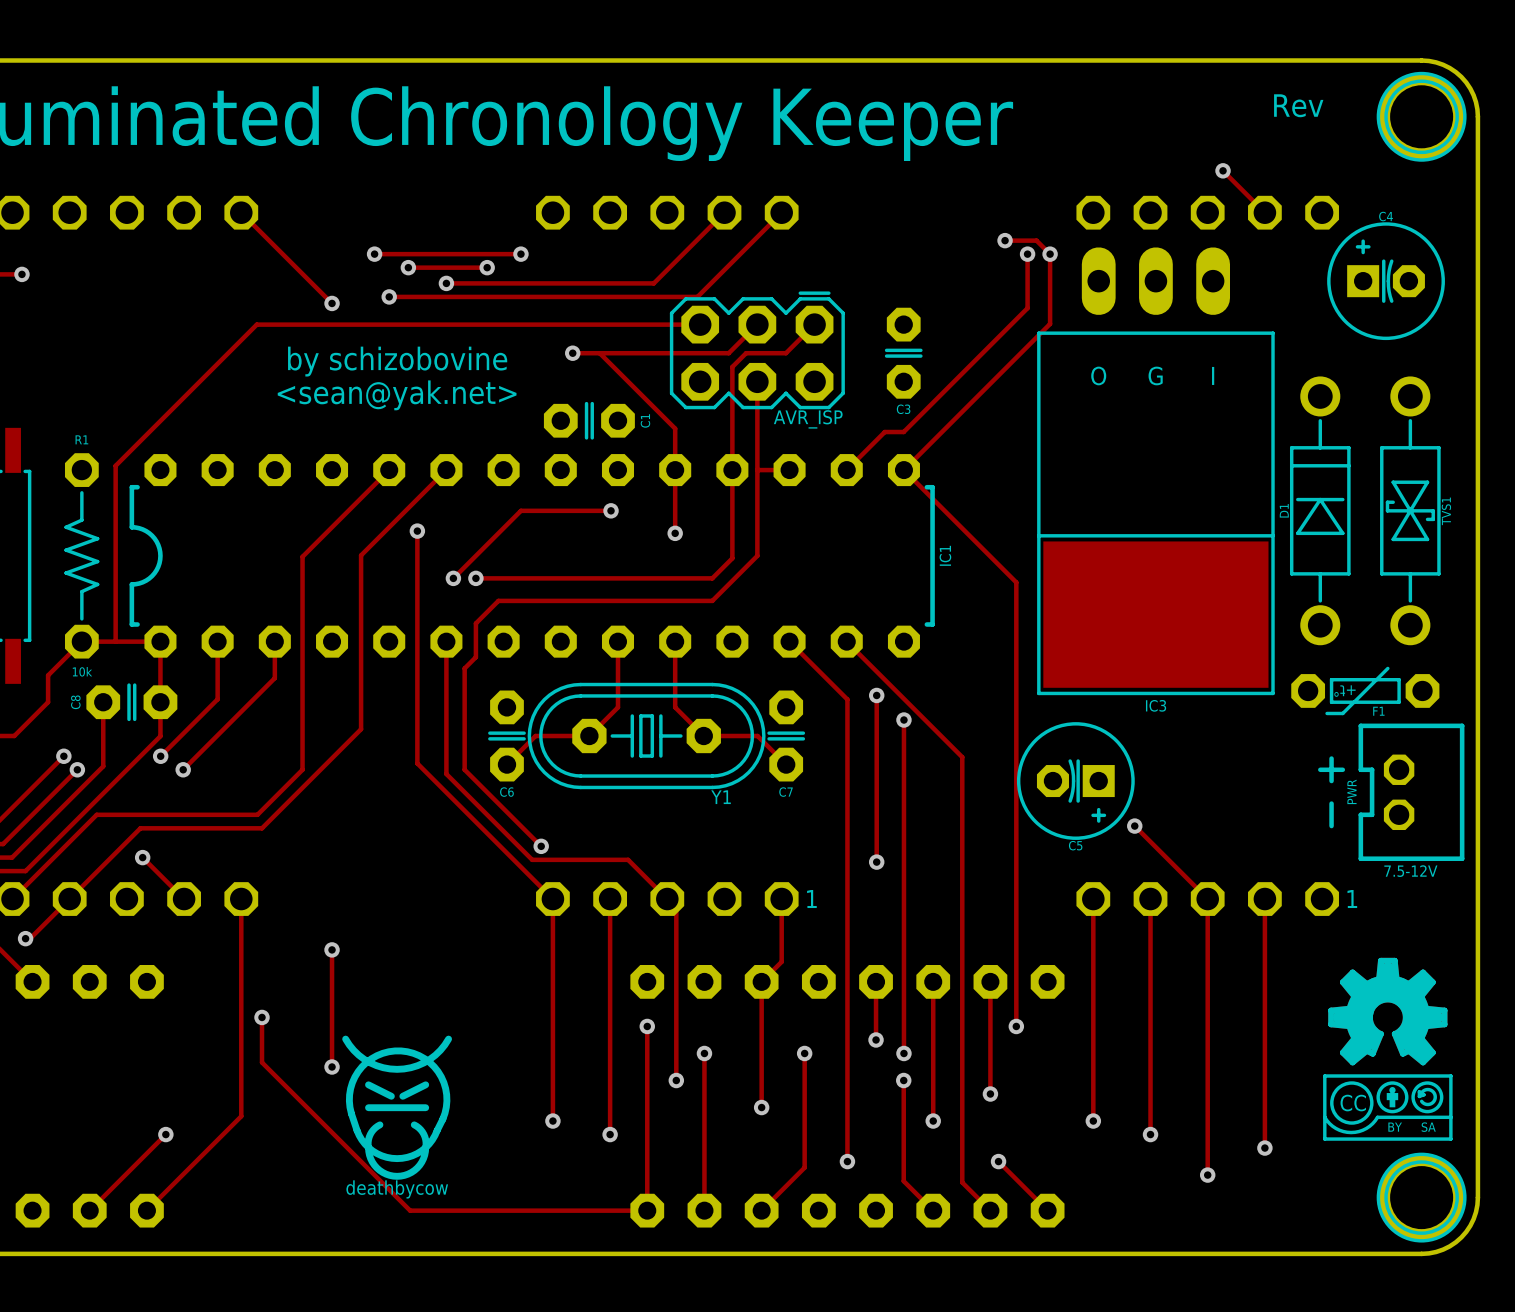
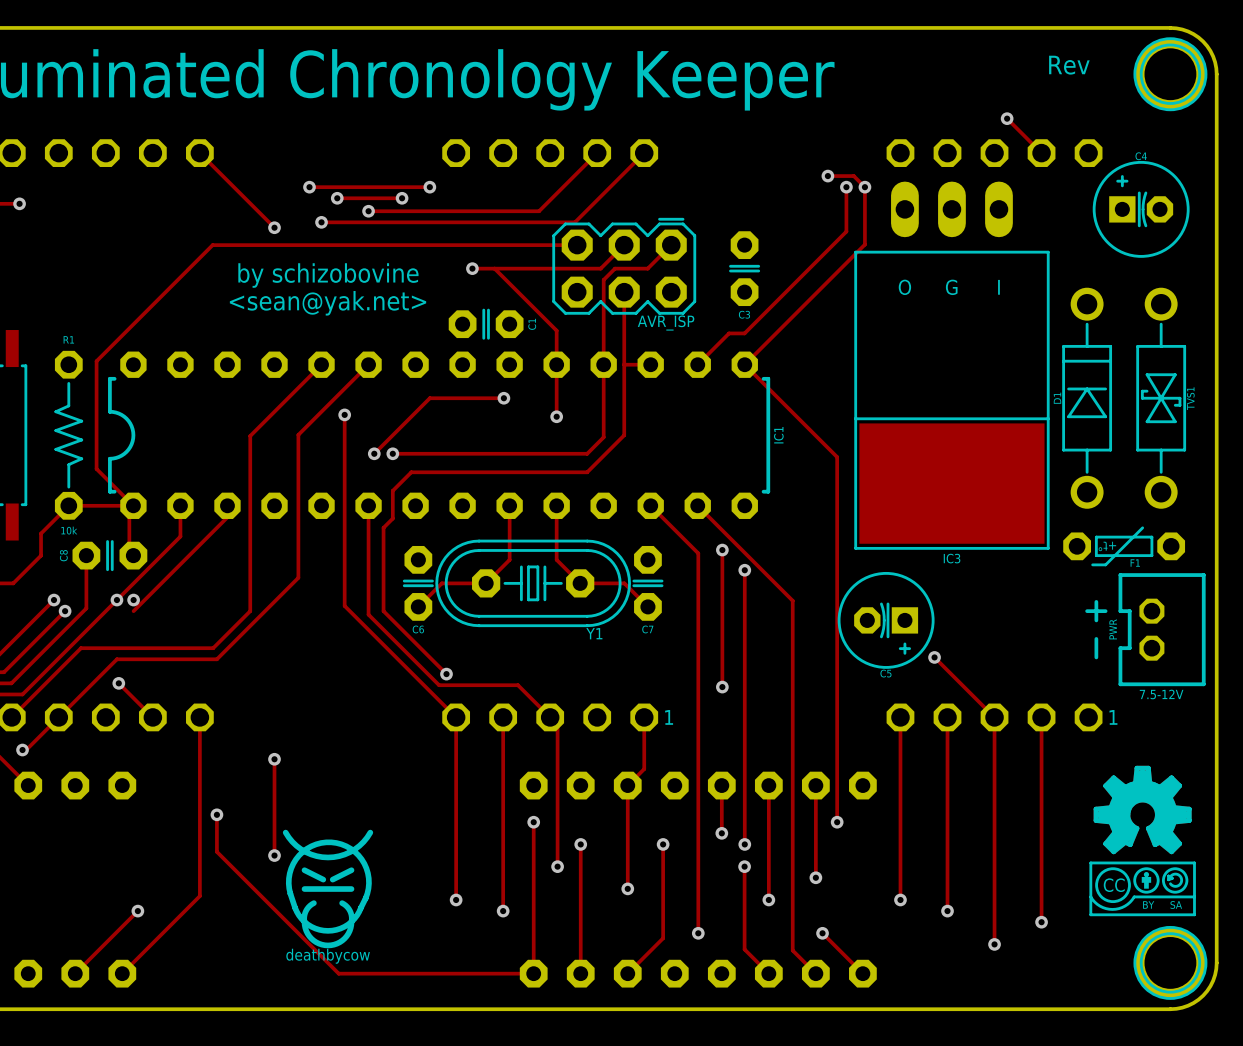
track: (115, 596) (115, 641) -> (96, 468) (133, 505) (129, 509) (129, 555)
track: (160, 641) (160, 736) -> none
track: (274, 655) (274, 678) (183, 769) -> (227, 517) (133, 611)
track: (217, 679) (217, 699) (160, 756) -> (180, 536) (133, 583)
via position: (183, 769) -> (116, 600)

